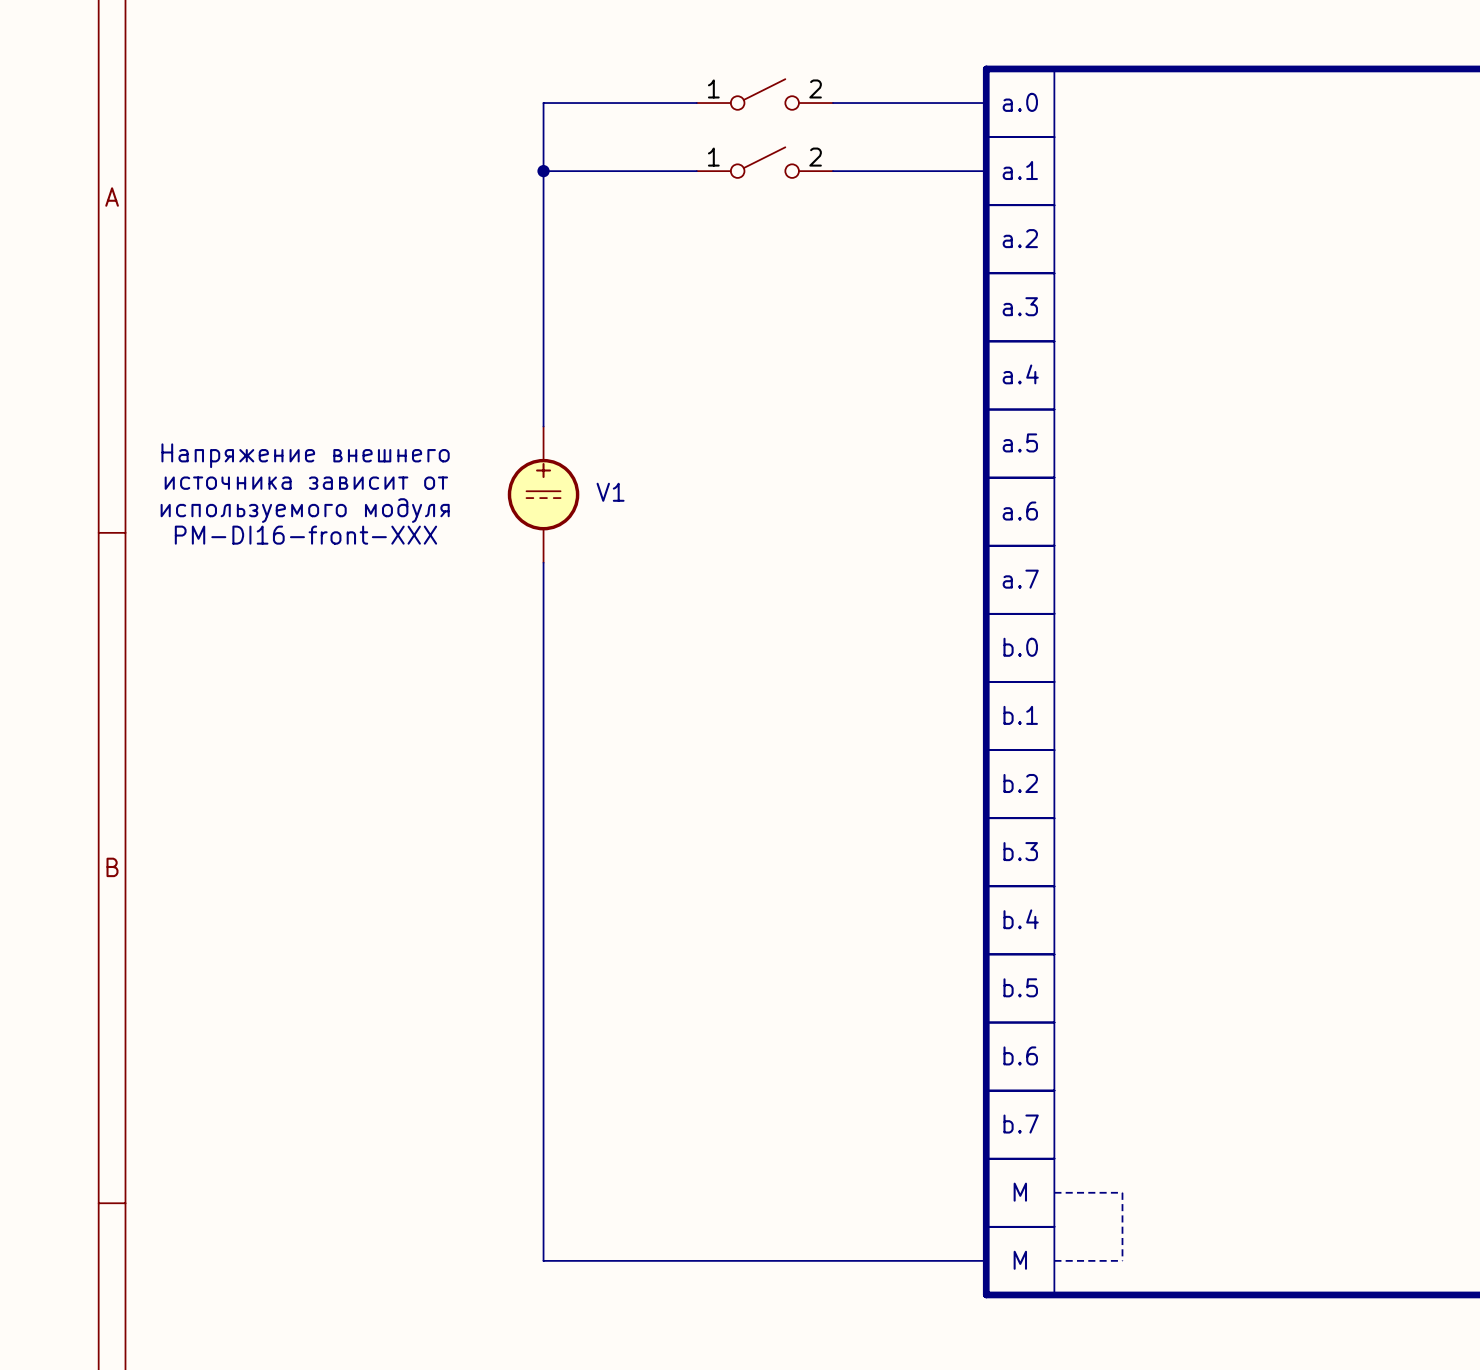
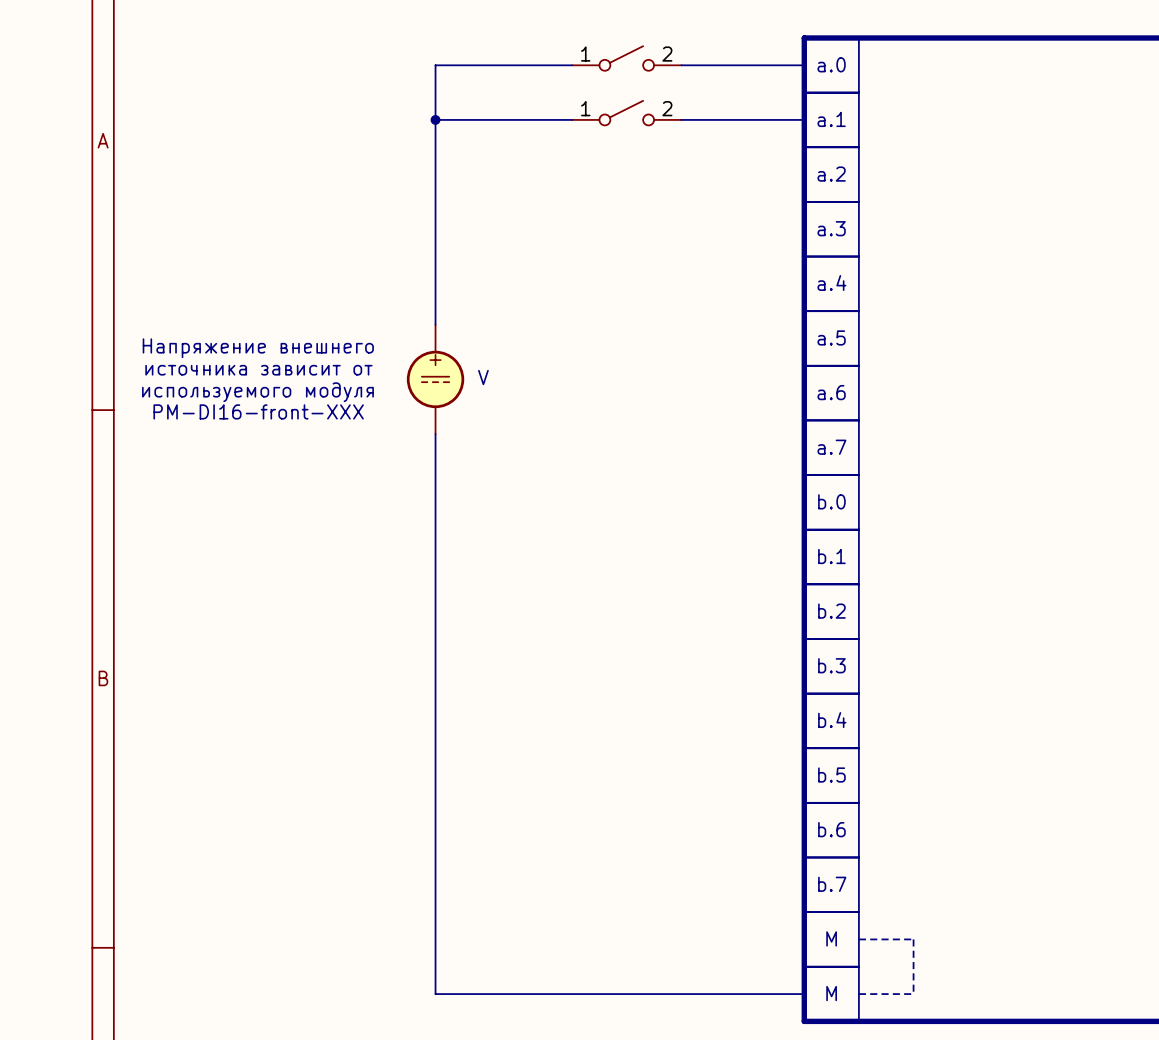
wire: (543, 103) (543, 426) -> (449, 65) (435, 65) (435, 324)
wire: none -> (435, 119) (449, 119)
junction position: (543, 171) -> (435, 119)
V: none -> (435, 379)
V1: (543, 494) -> none
wire: (543, 562) (543, 1260) -> (435, 434) (435, 994) (449, 994)

